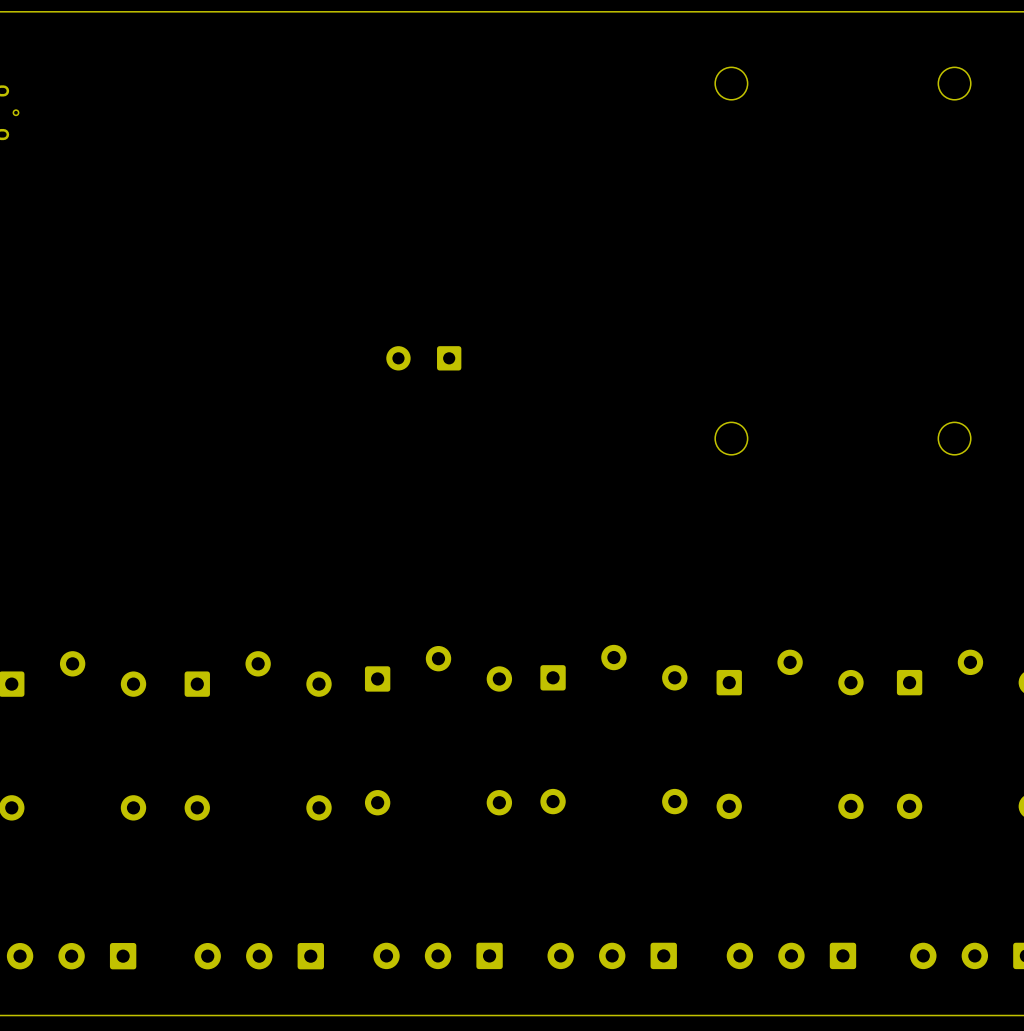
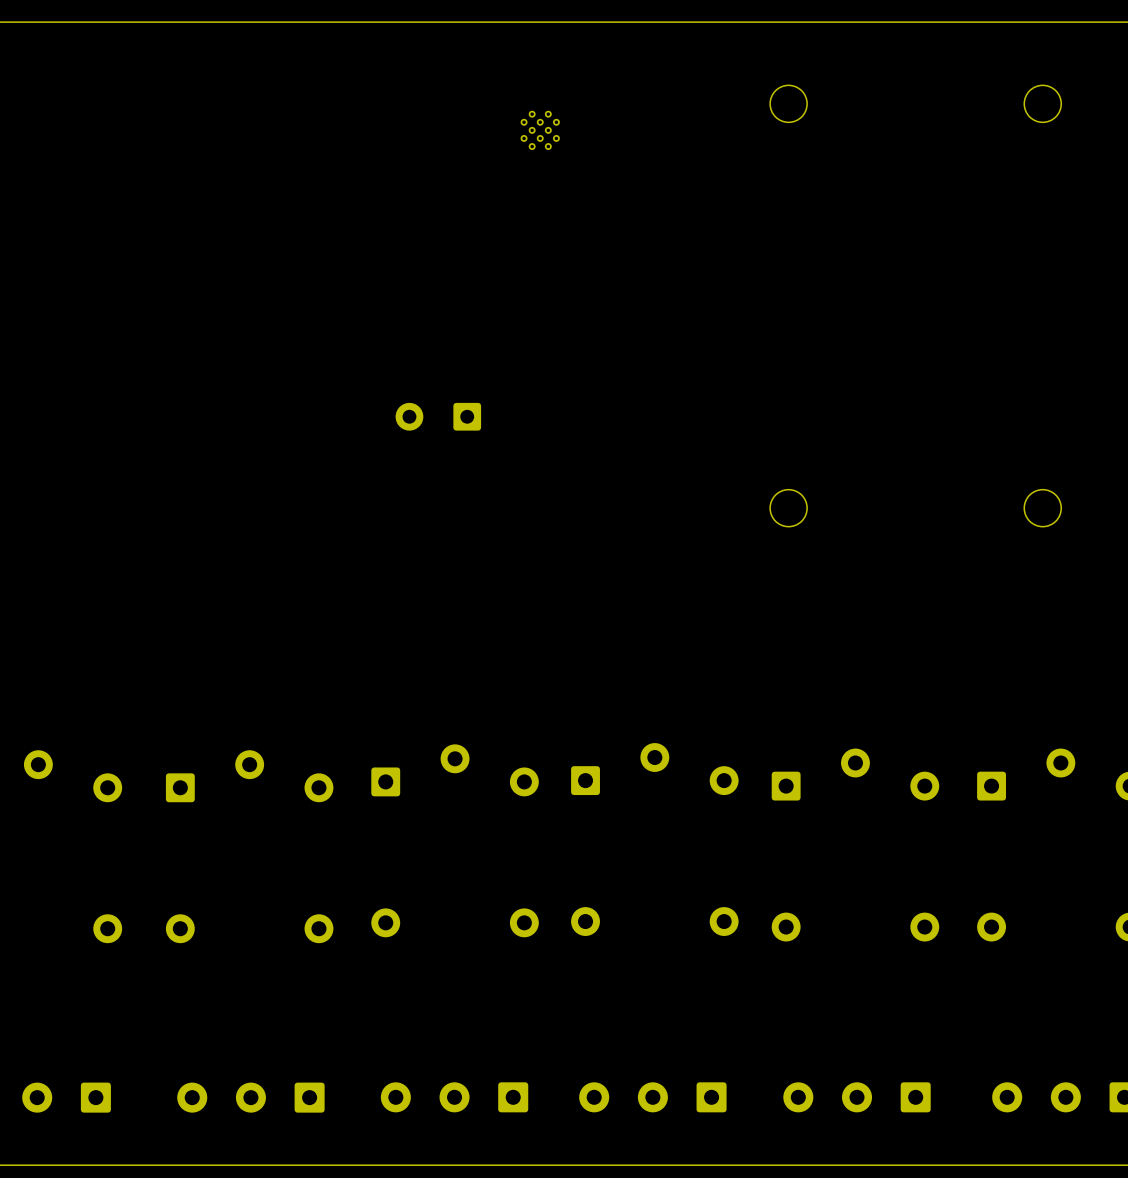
part: none -> (540, 130)

